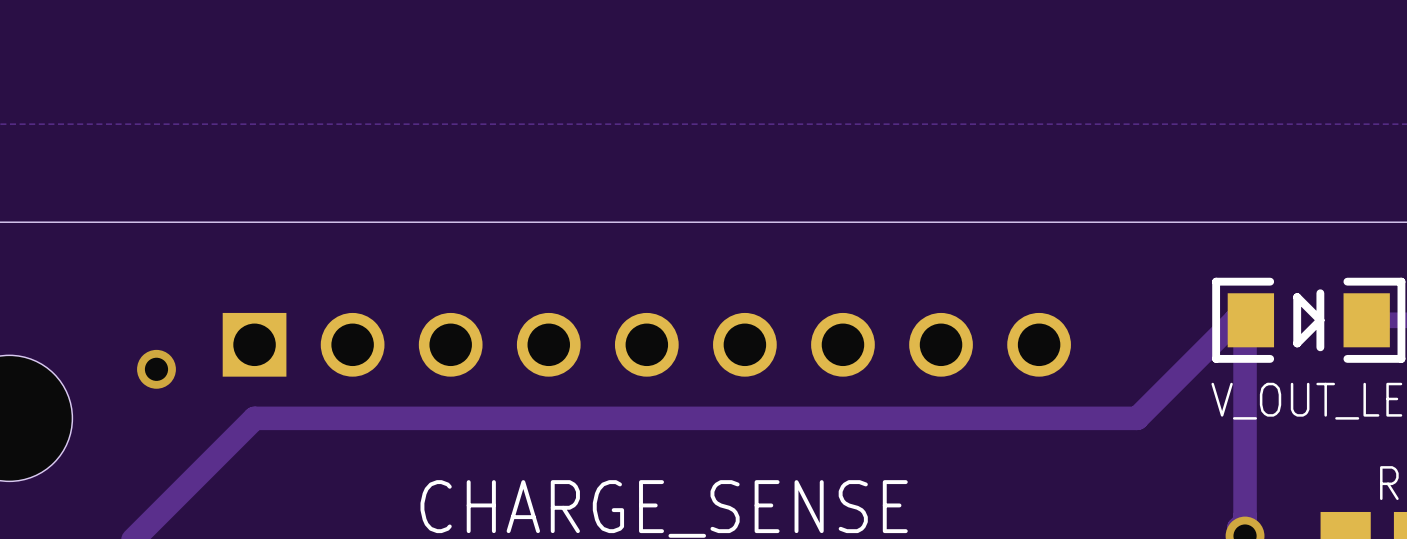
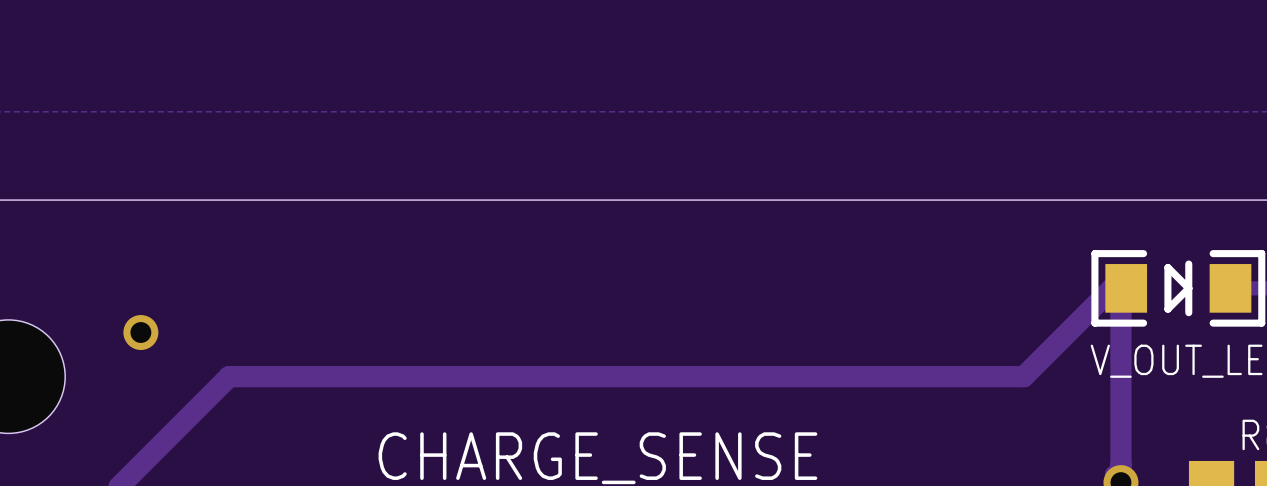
part: (646, 344) -> none

